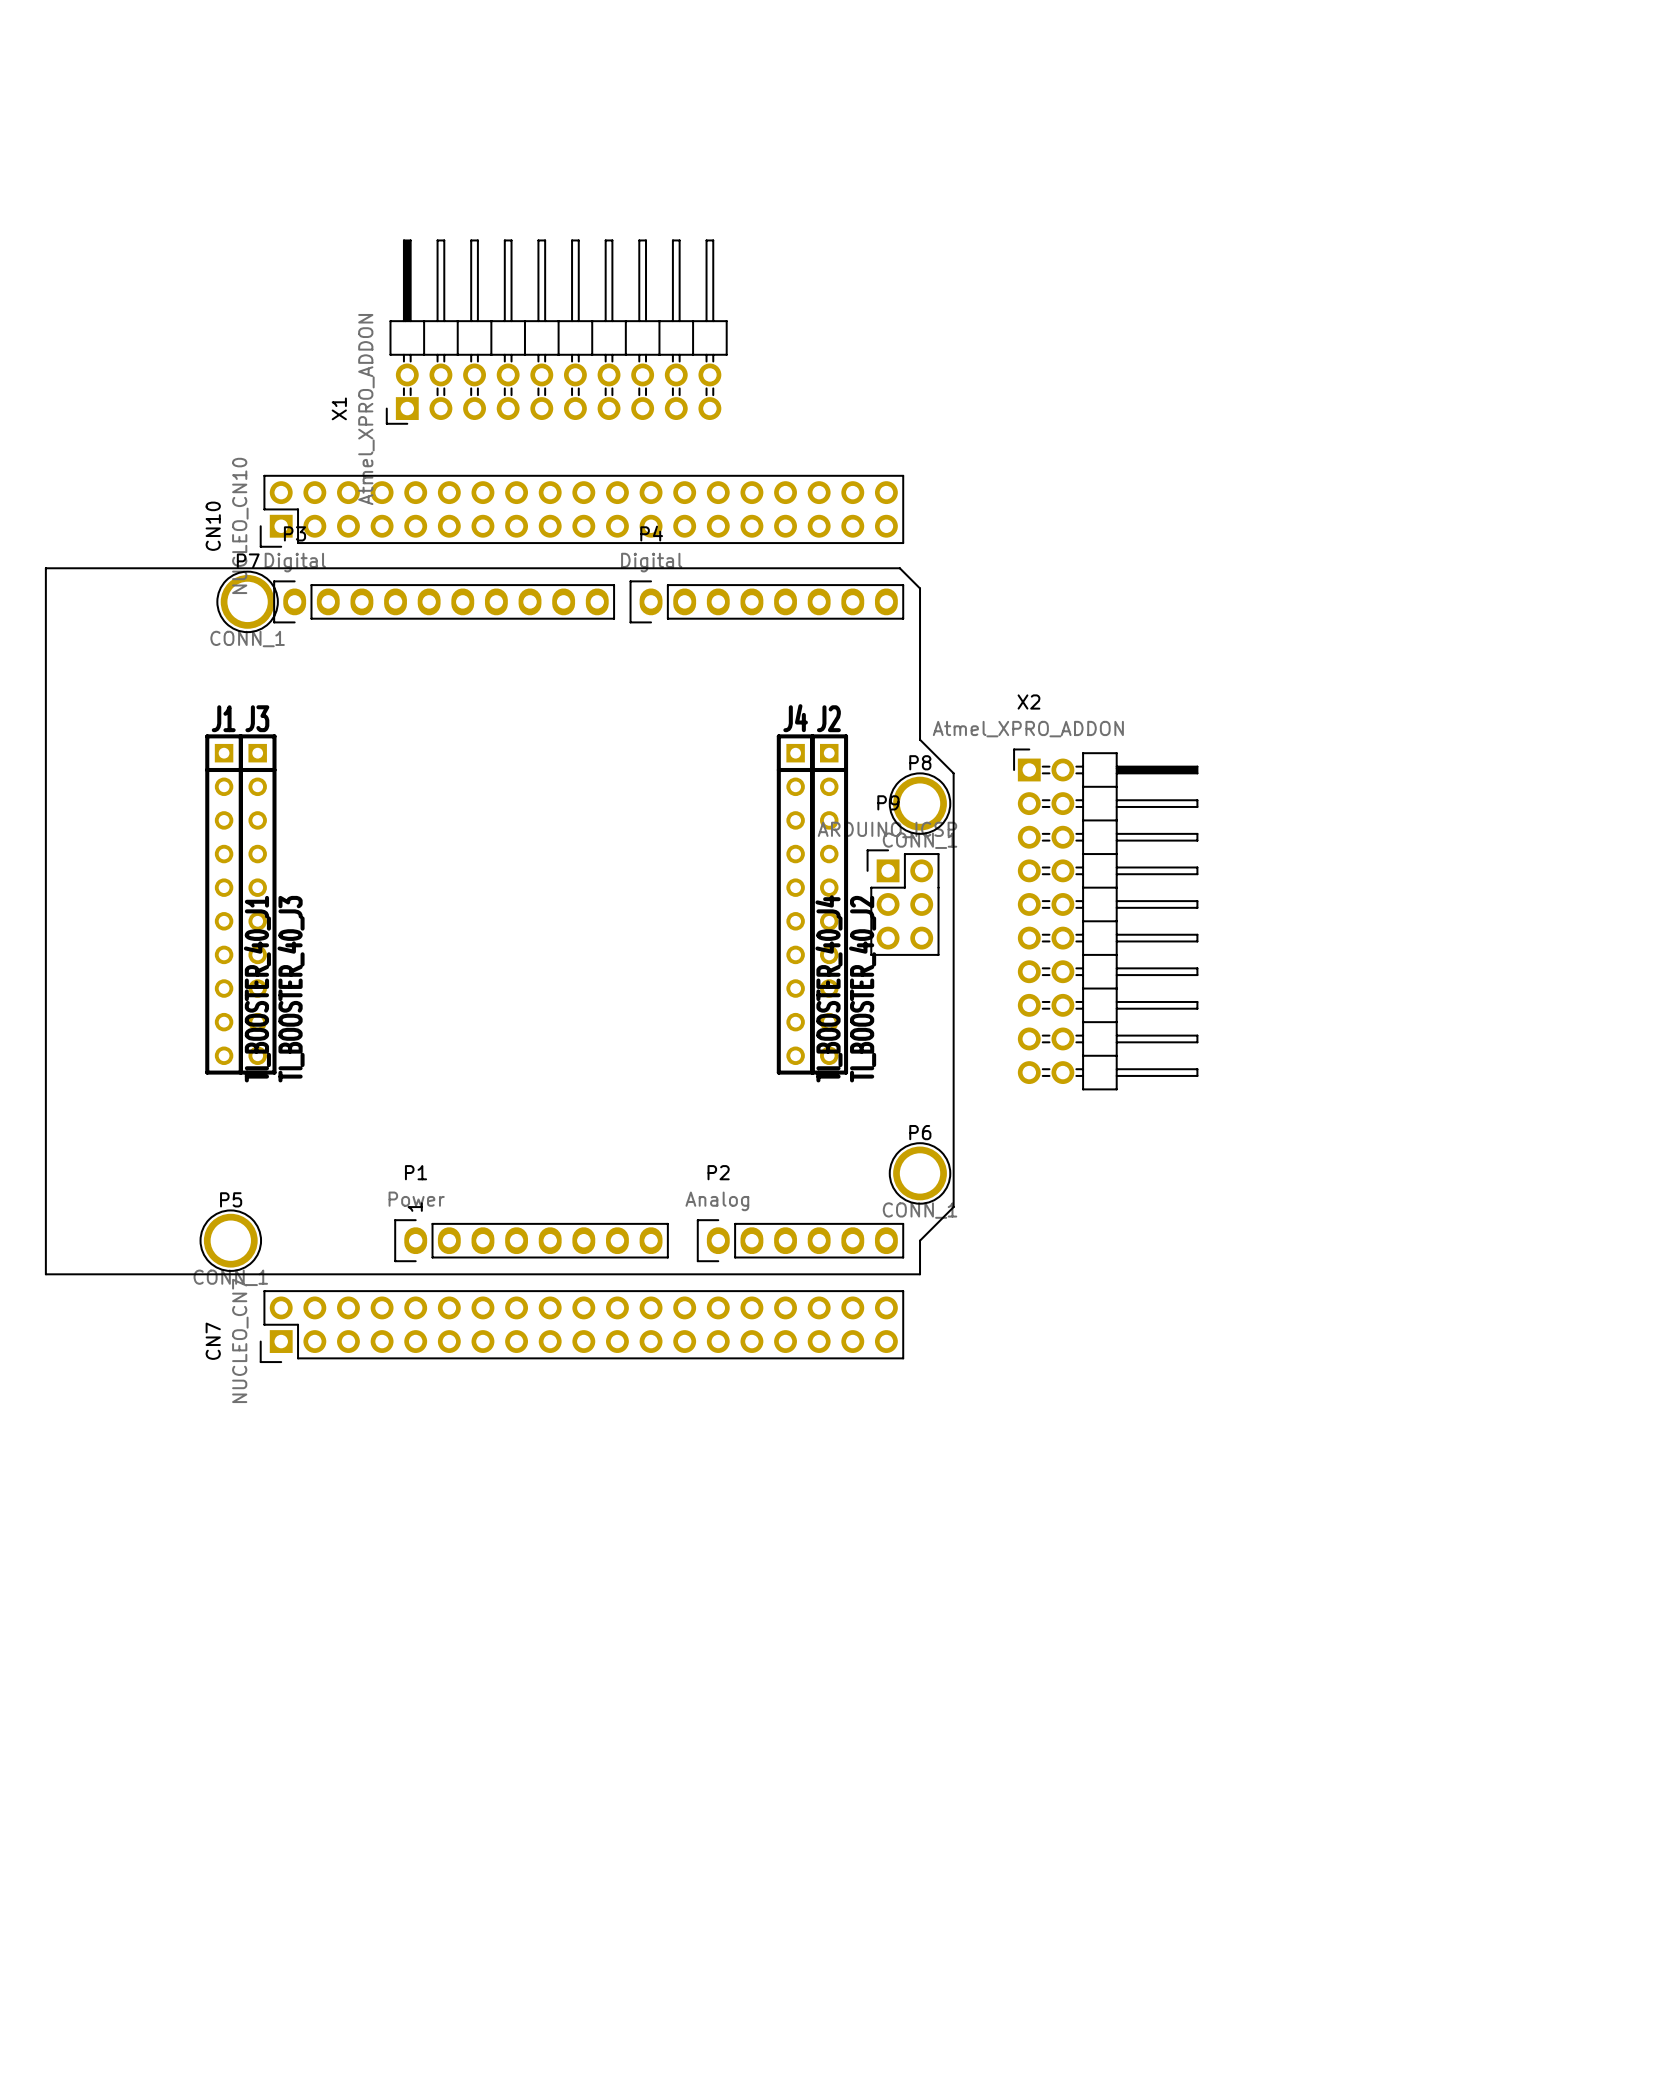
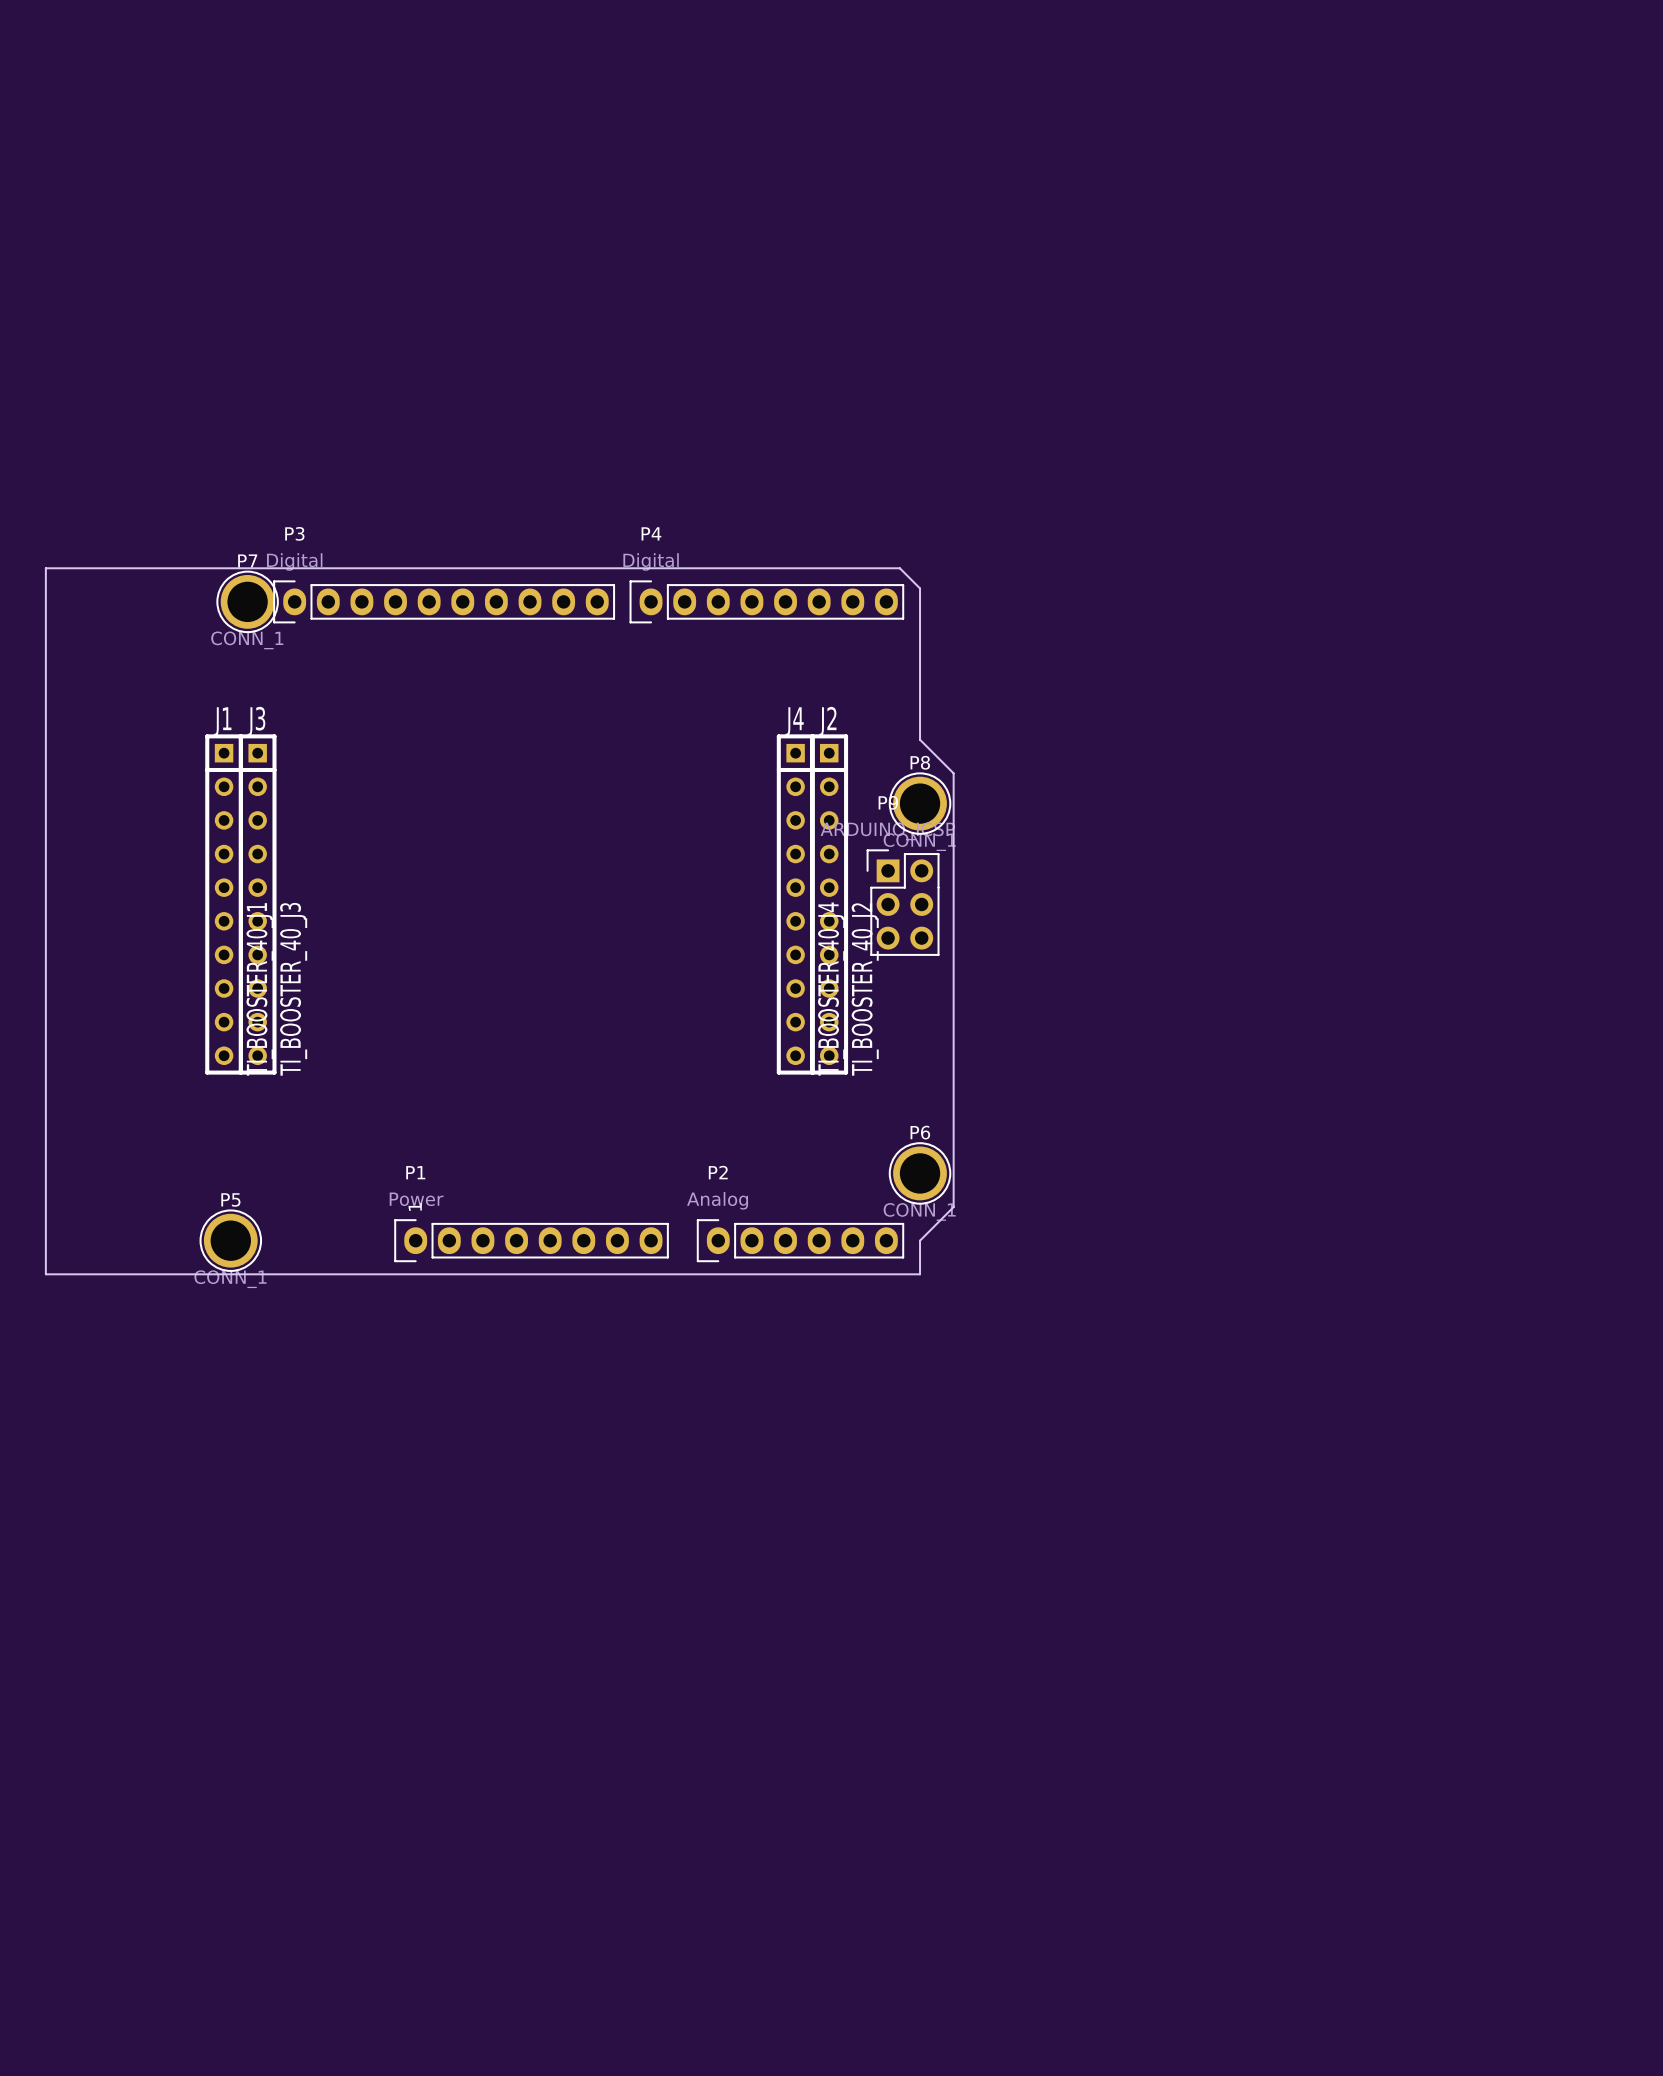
X1: Atmel_XPRO_ADDON (556, 332) -> none
CN10: NUCLEO_CN10 (581, 511) -> none
X2: Atmel_XPRO_ADDON (1105, 919) -> none
CN7: NUCLEO_CN7 (581, 1326) -> none

